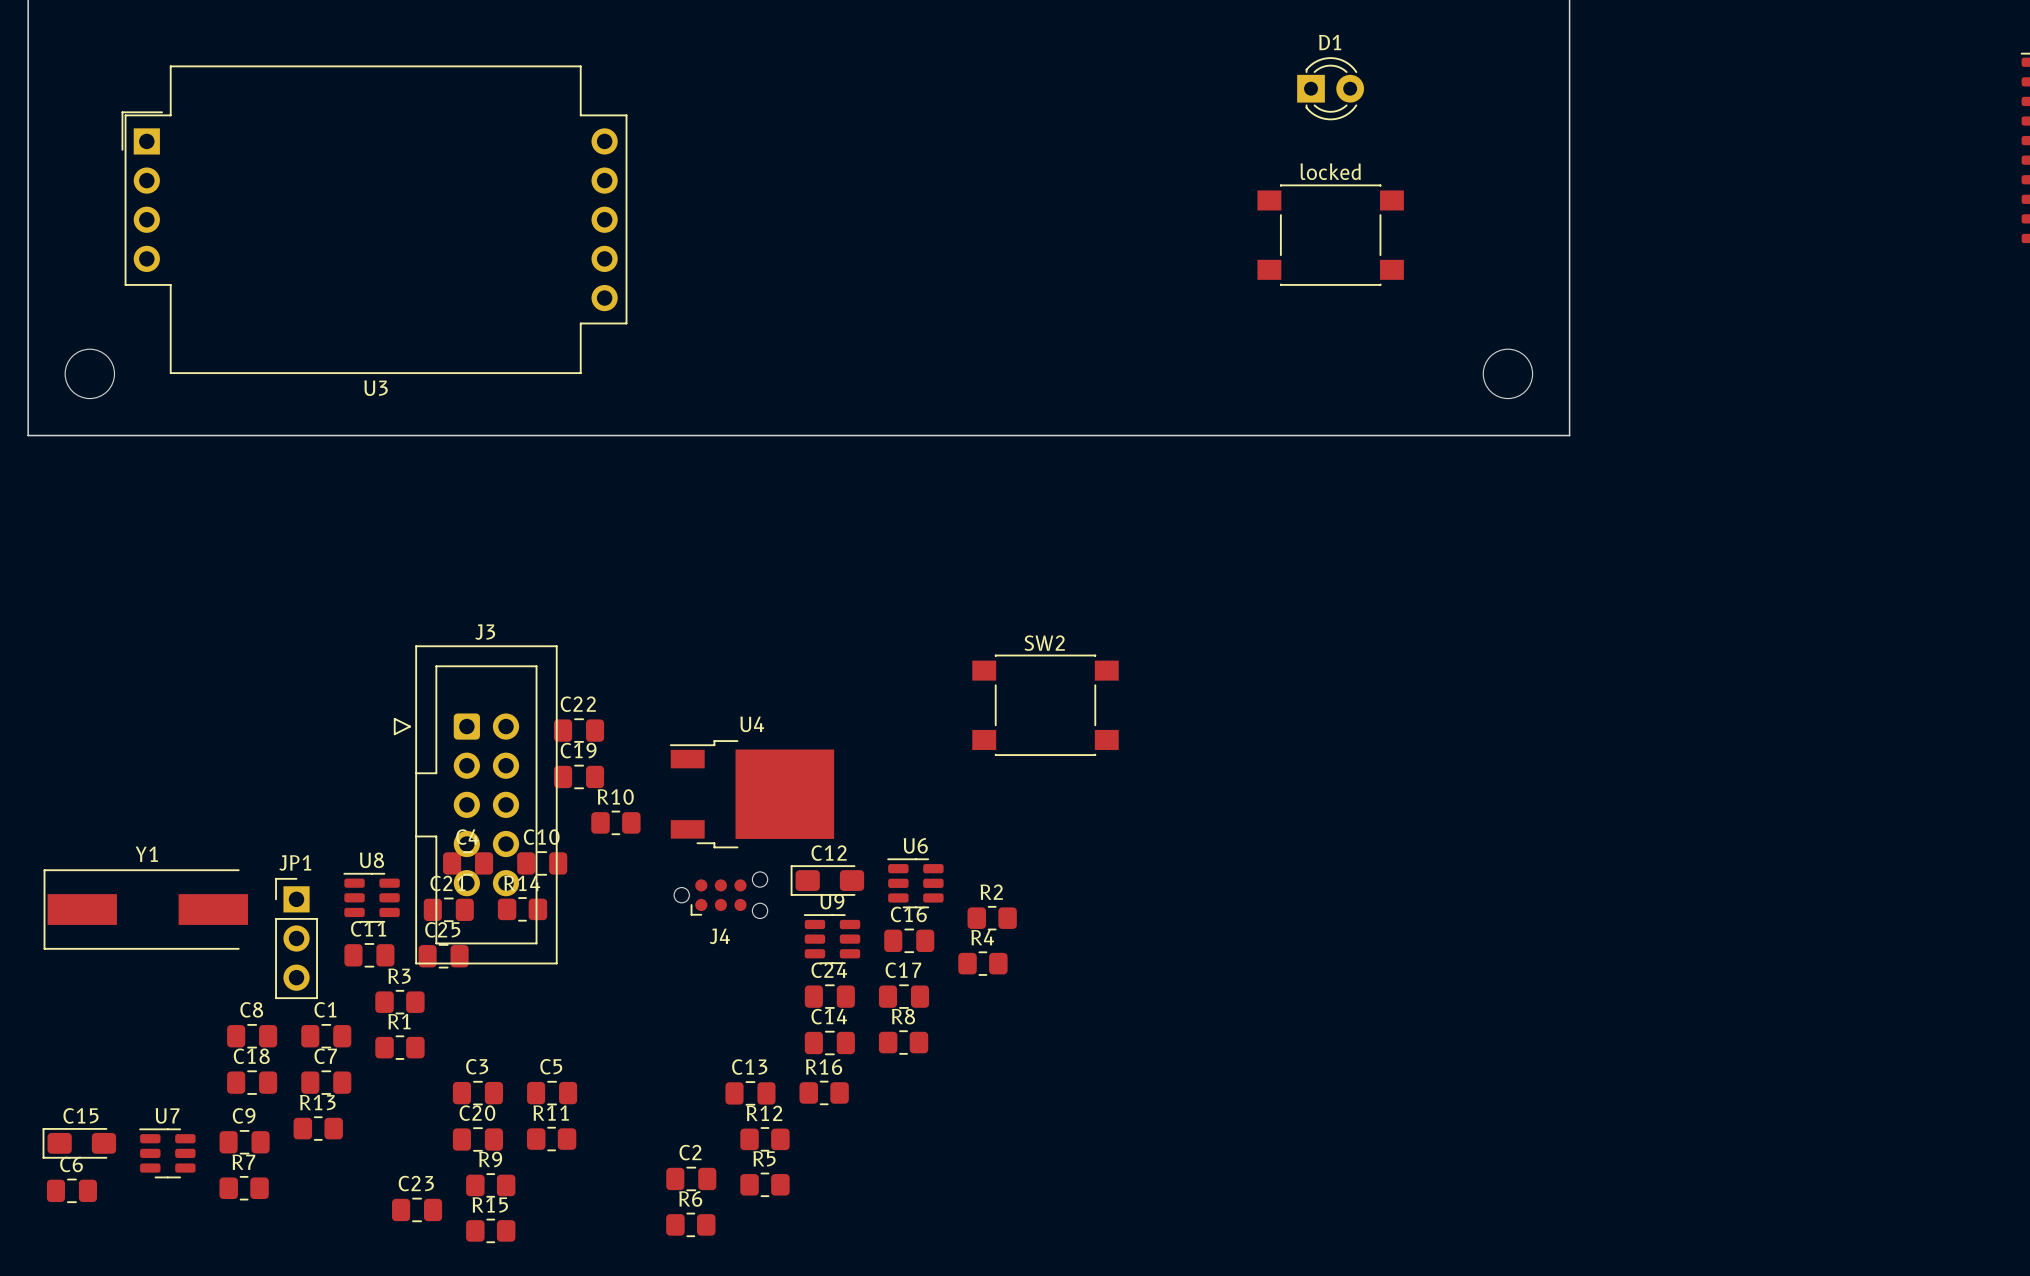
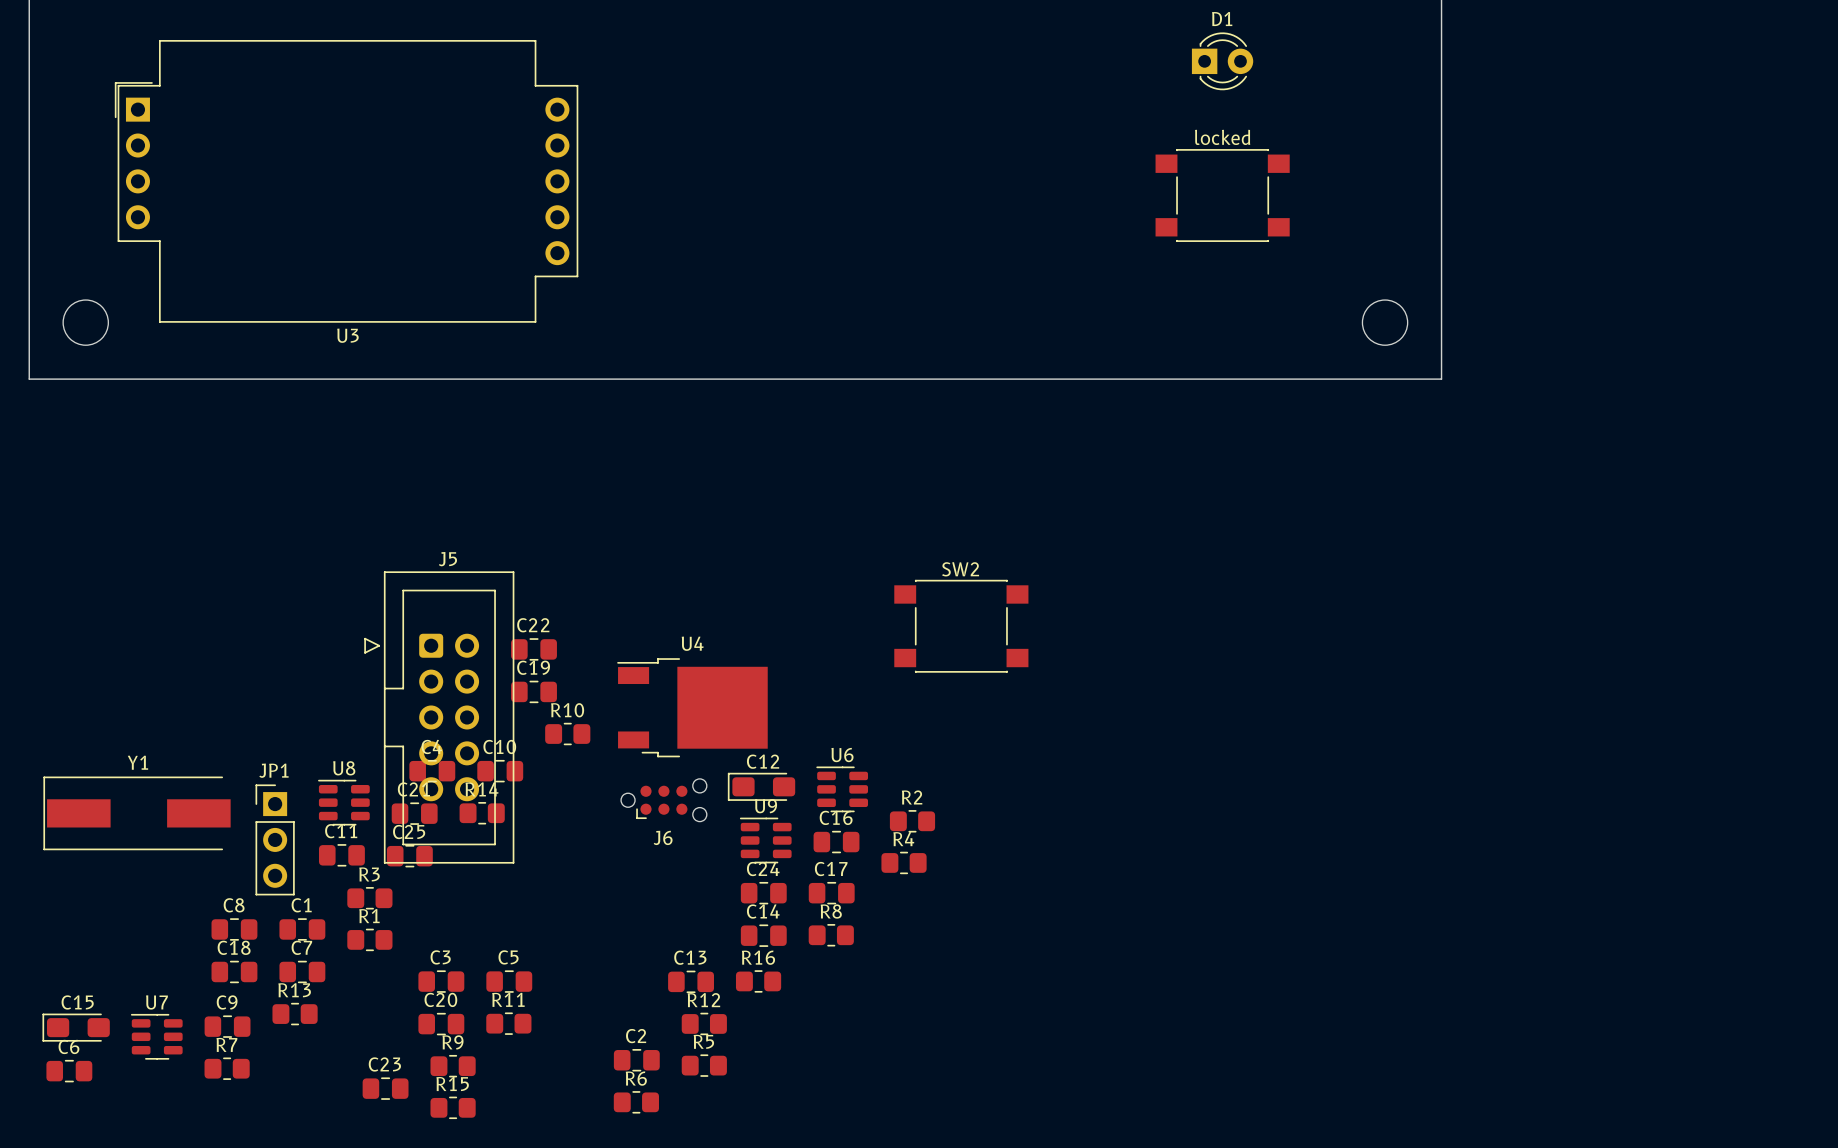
J3 name: J3 (485, 632) -> J5 (447, 559)
J4 name: J4 (719, 936) -> J6 (663, 837)

